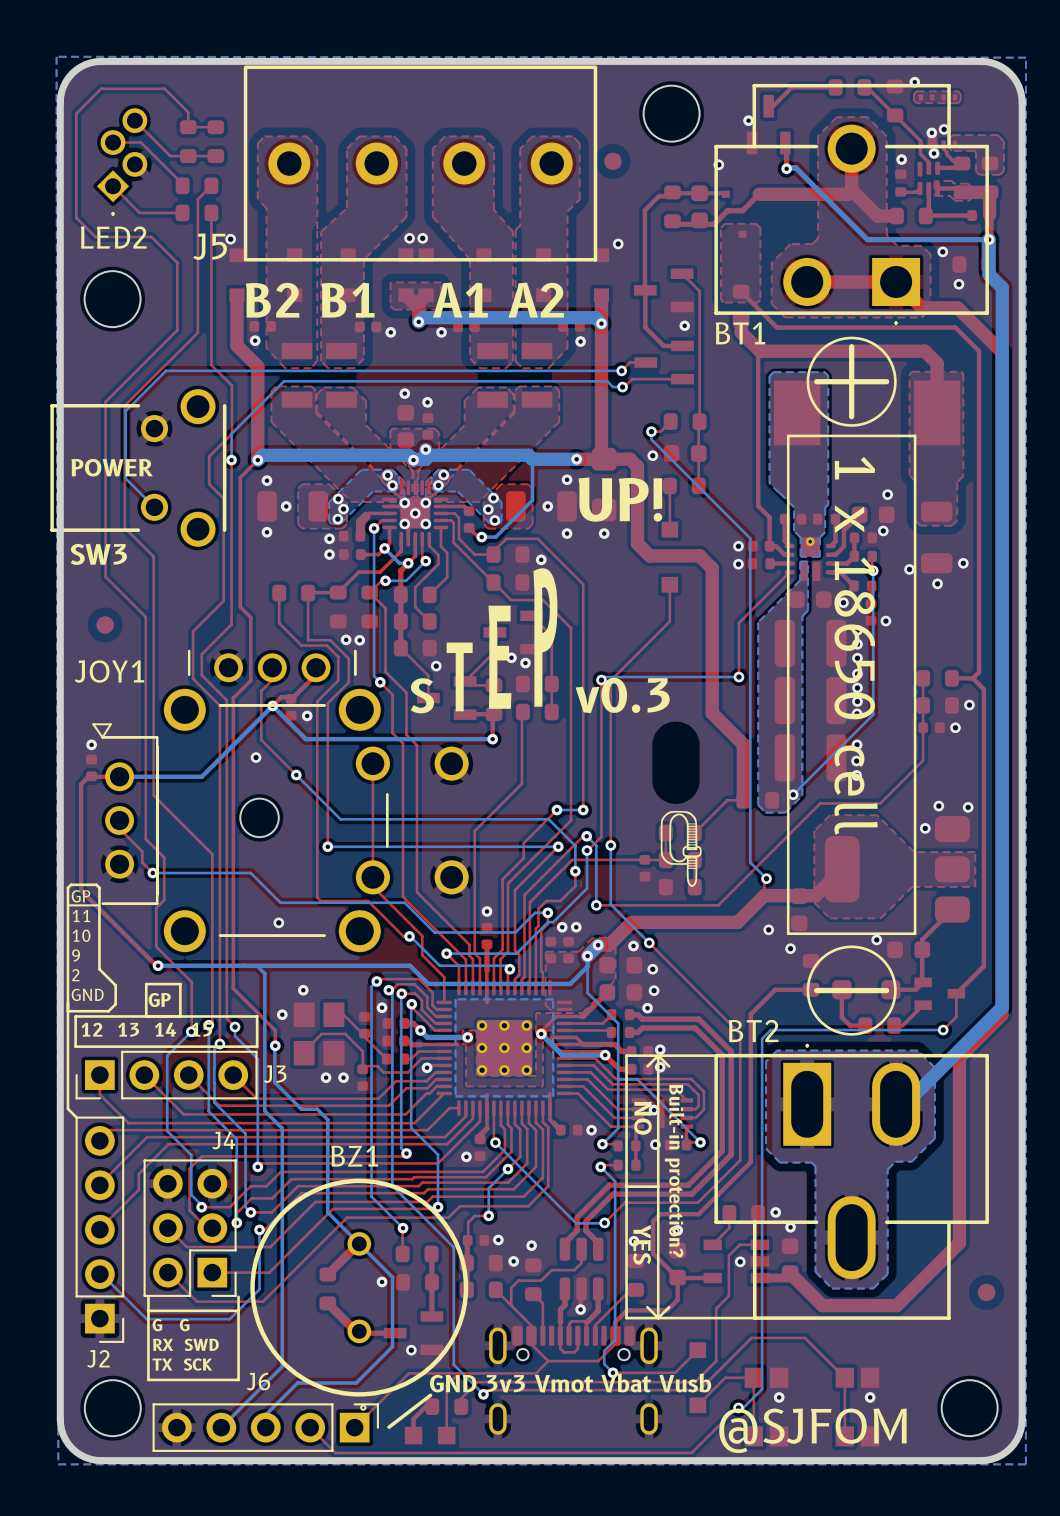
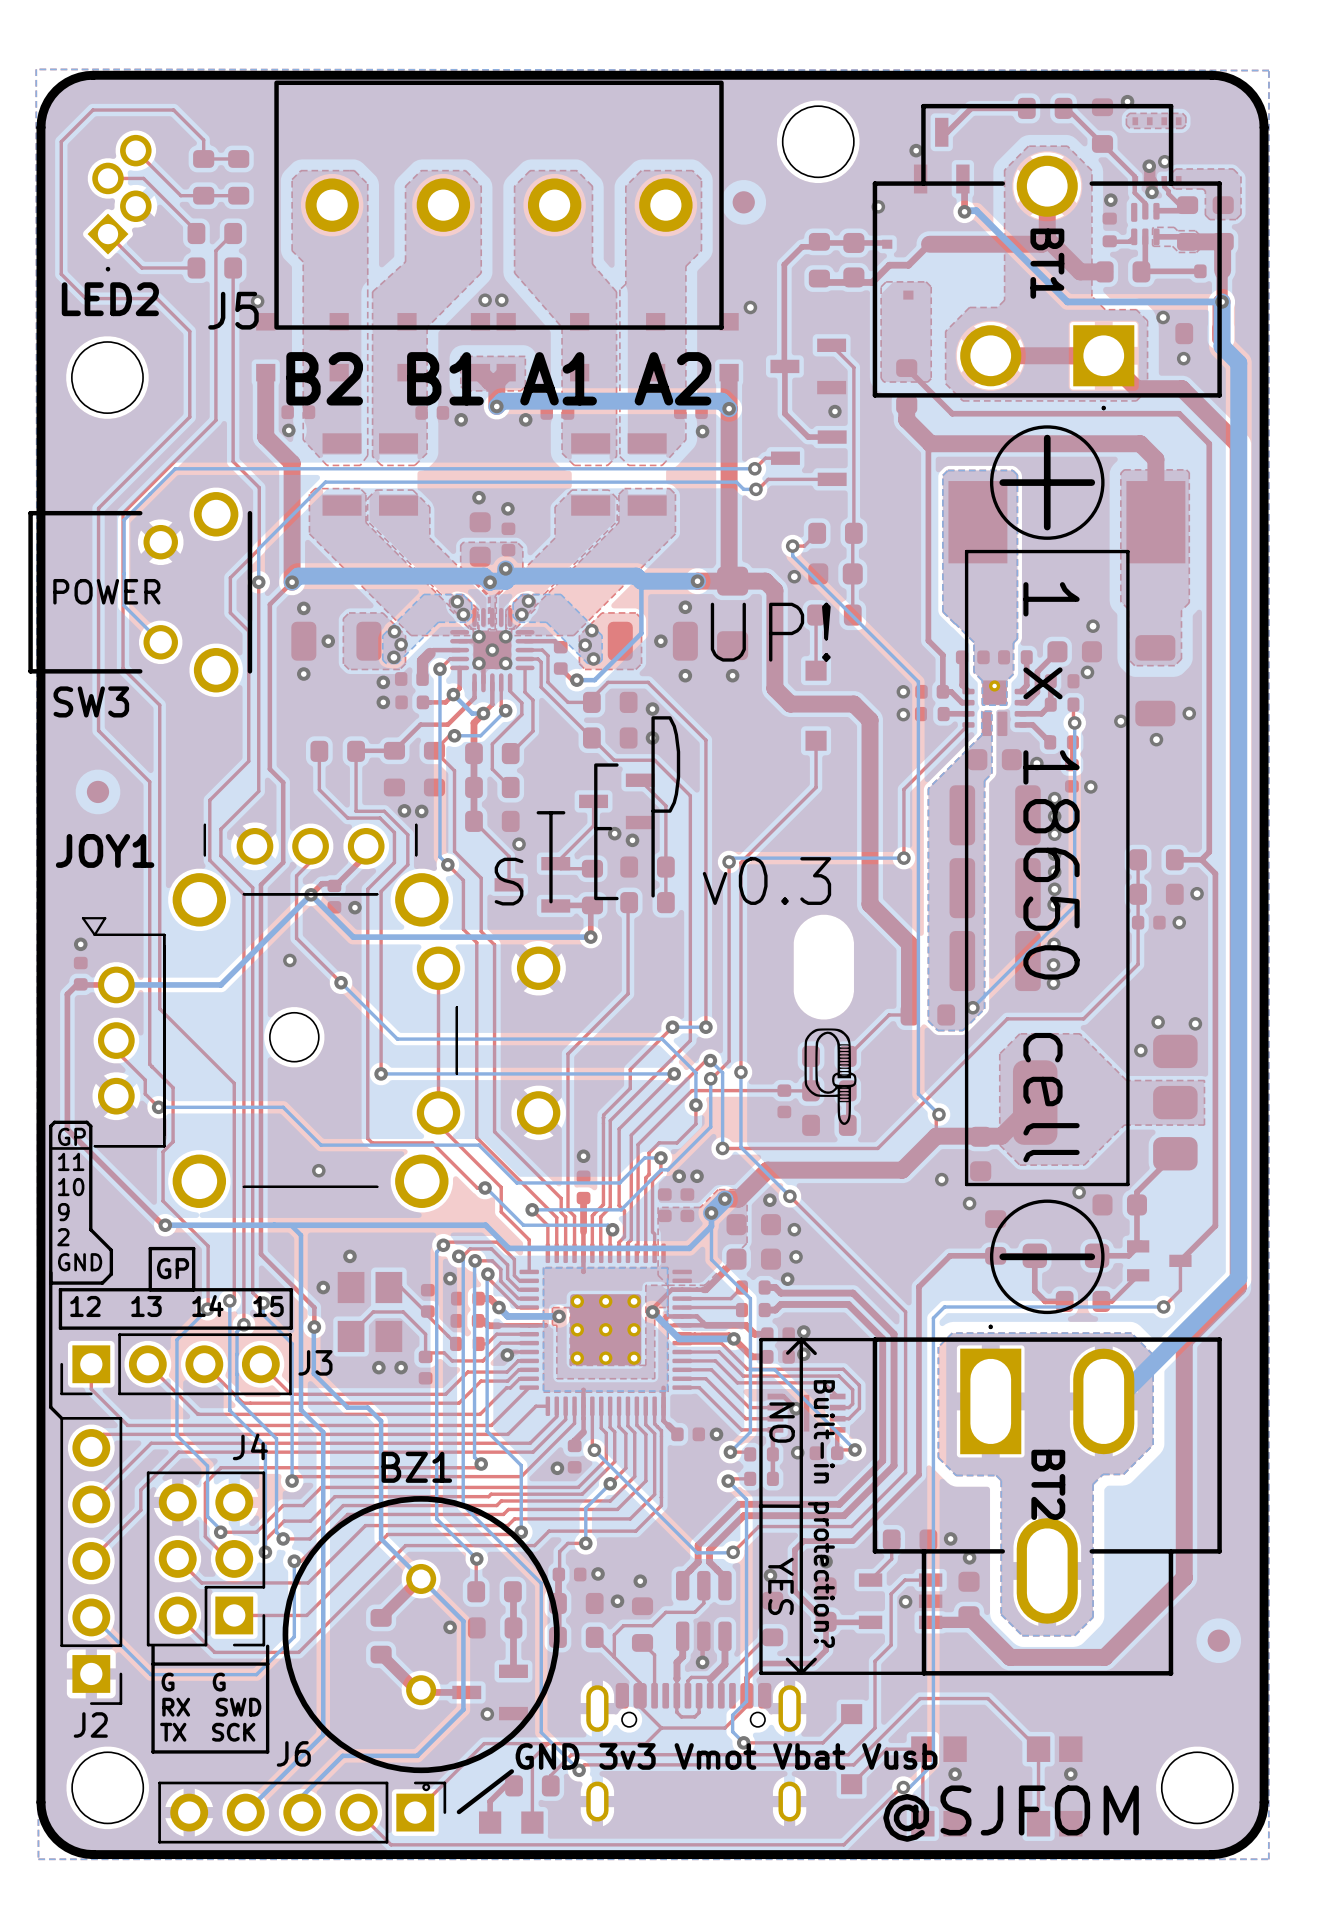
BT1 name rotation: 0° (740, 333) -> 90° clockwise (1047, 263)
BT1 name position: BT1 (740, 333) -> BT1 (1047, 263)
BT2 name rotation: 0° (753, 1030) -> 90° clockwise (1048, 1484)
BT2 name position: BT2 (753, 1030) -> BT2 (1048, 1484)

